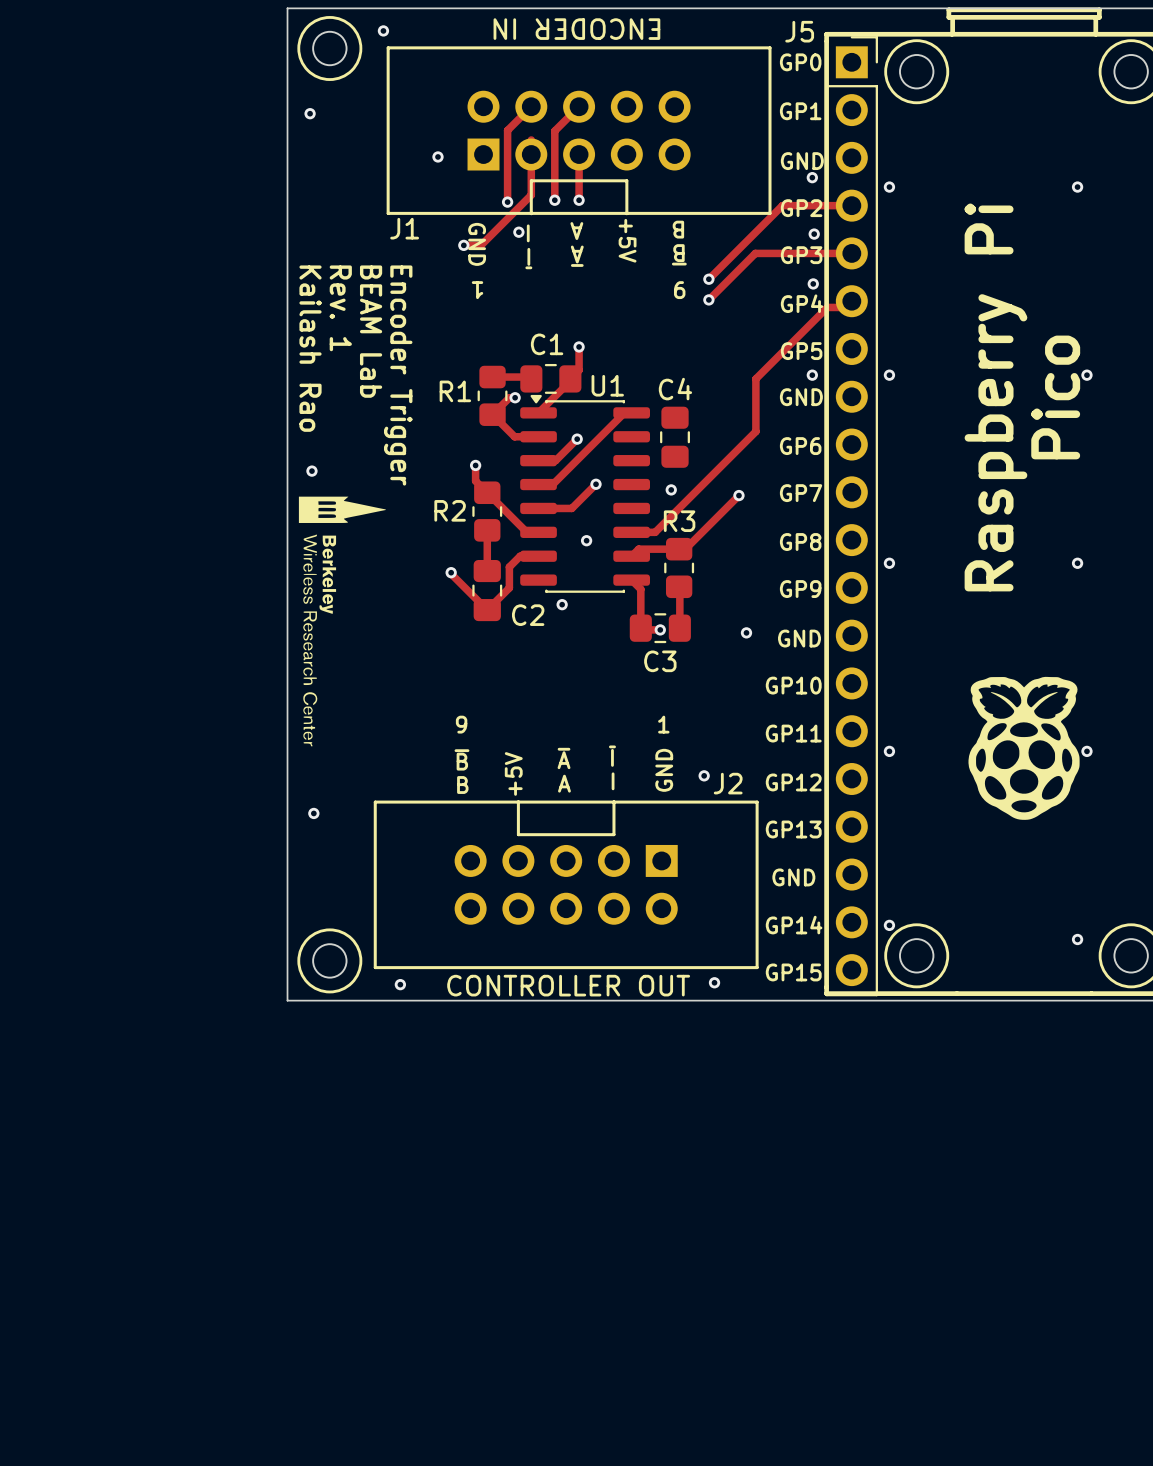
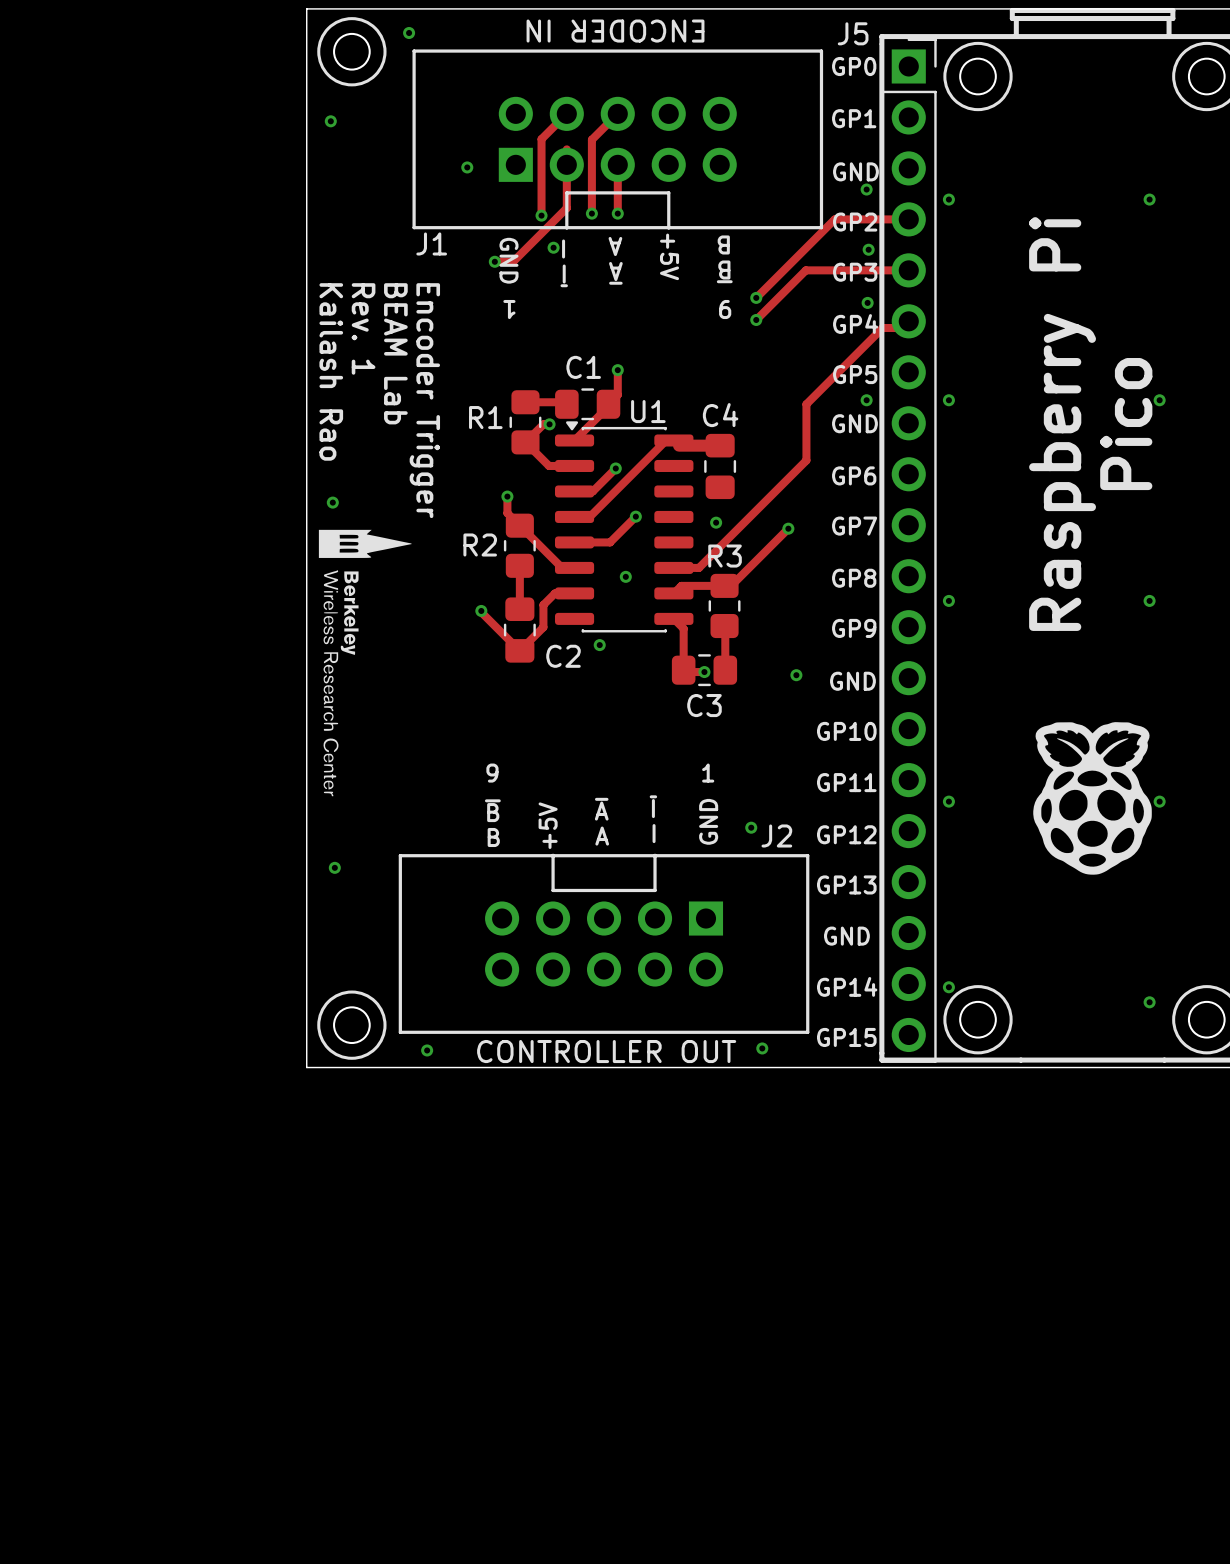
track: none -> (673, 440) (679, 445) (720, 445)

